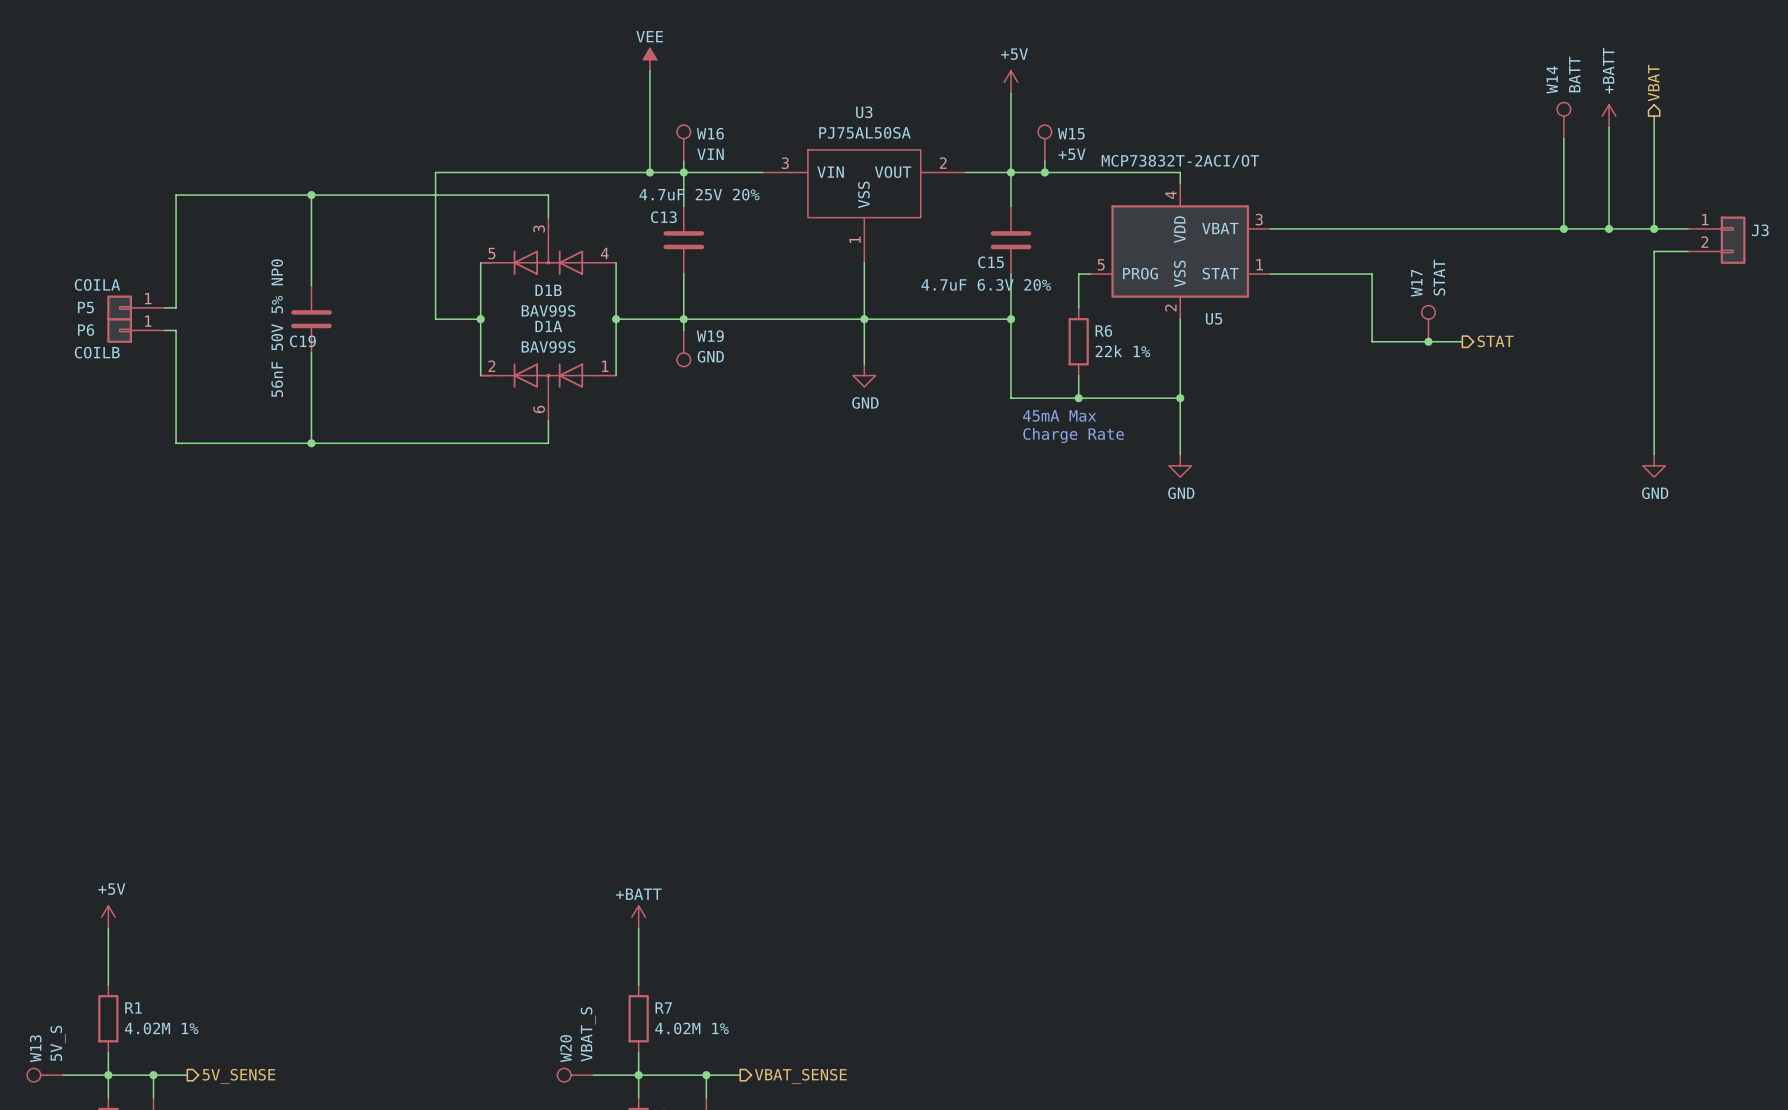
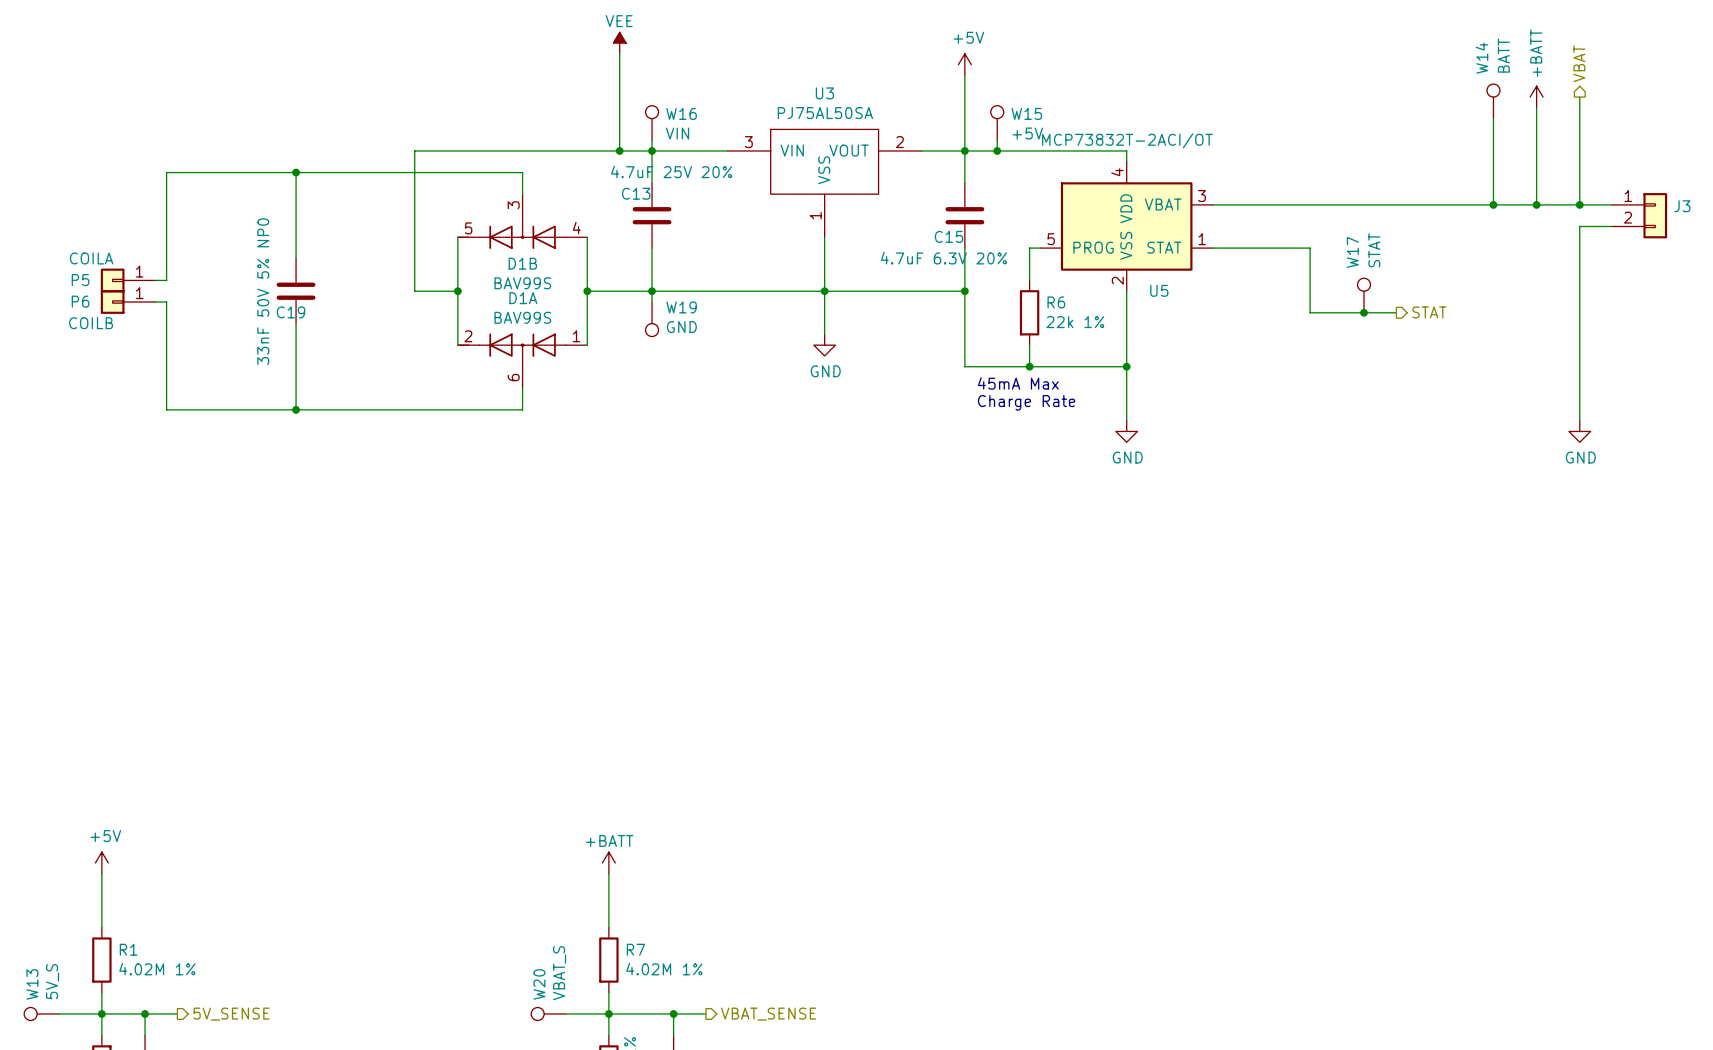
C19 value: 56nF 50V 5% NP0 (277, 328) -> 33nF 50V 5% NP0 (263, 291)

